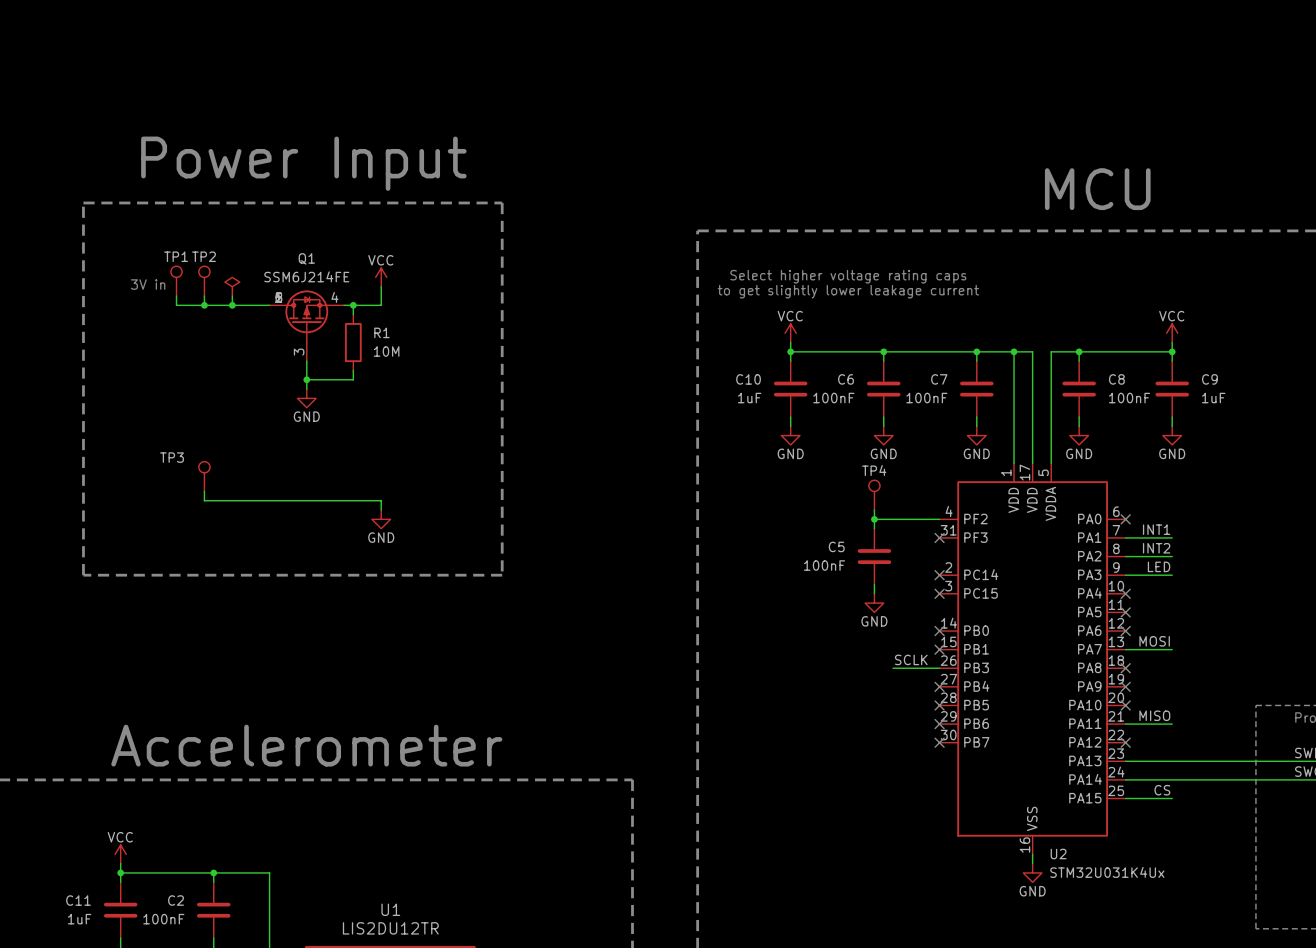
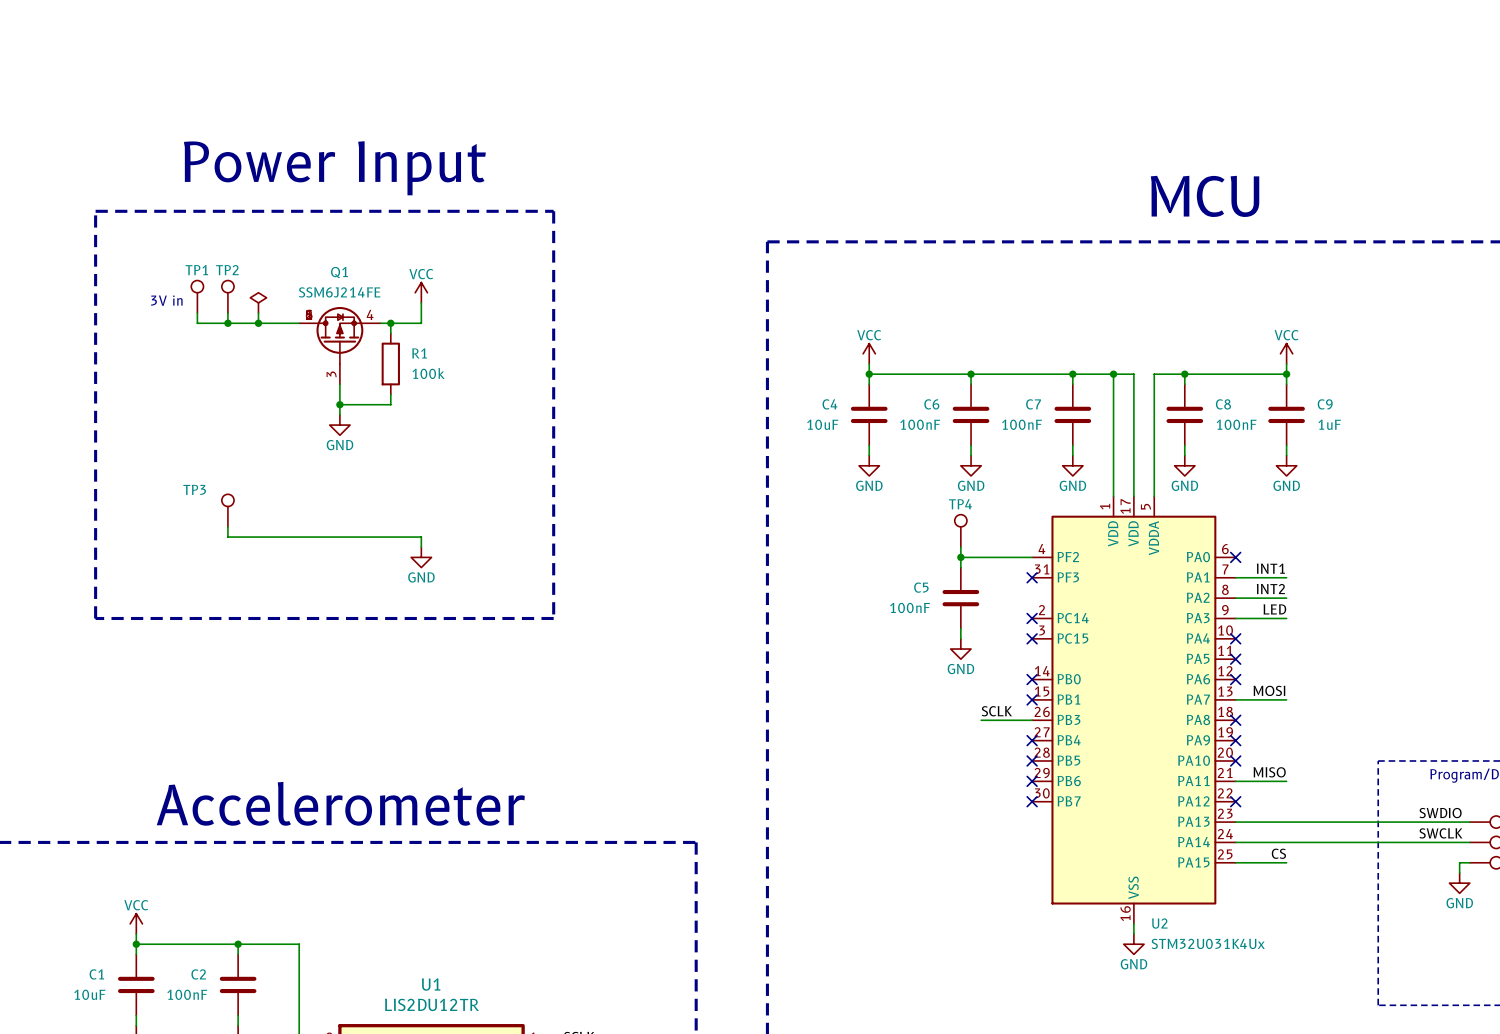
text: Select higher voltage rating caps (848, 276) -> none
text: to get slightly lower leakage current (848, 291) -> none
R1 value: 10M (386, 351) -> 100k (428, 373)
C10 name: C10 (748, 379) -> C4 (829, 404)
C10 value: 1uF (749, 398) -> 10uF (822, 424)
C11 name: C11 (78, 900) -> C1 (96, 974)
C11 value: 1uF (79, 919) -> 10uF (89, 994)

